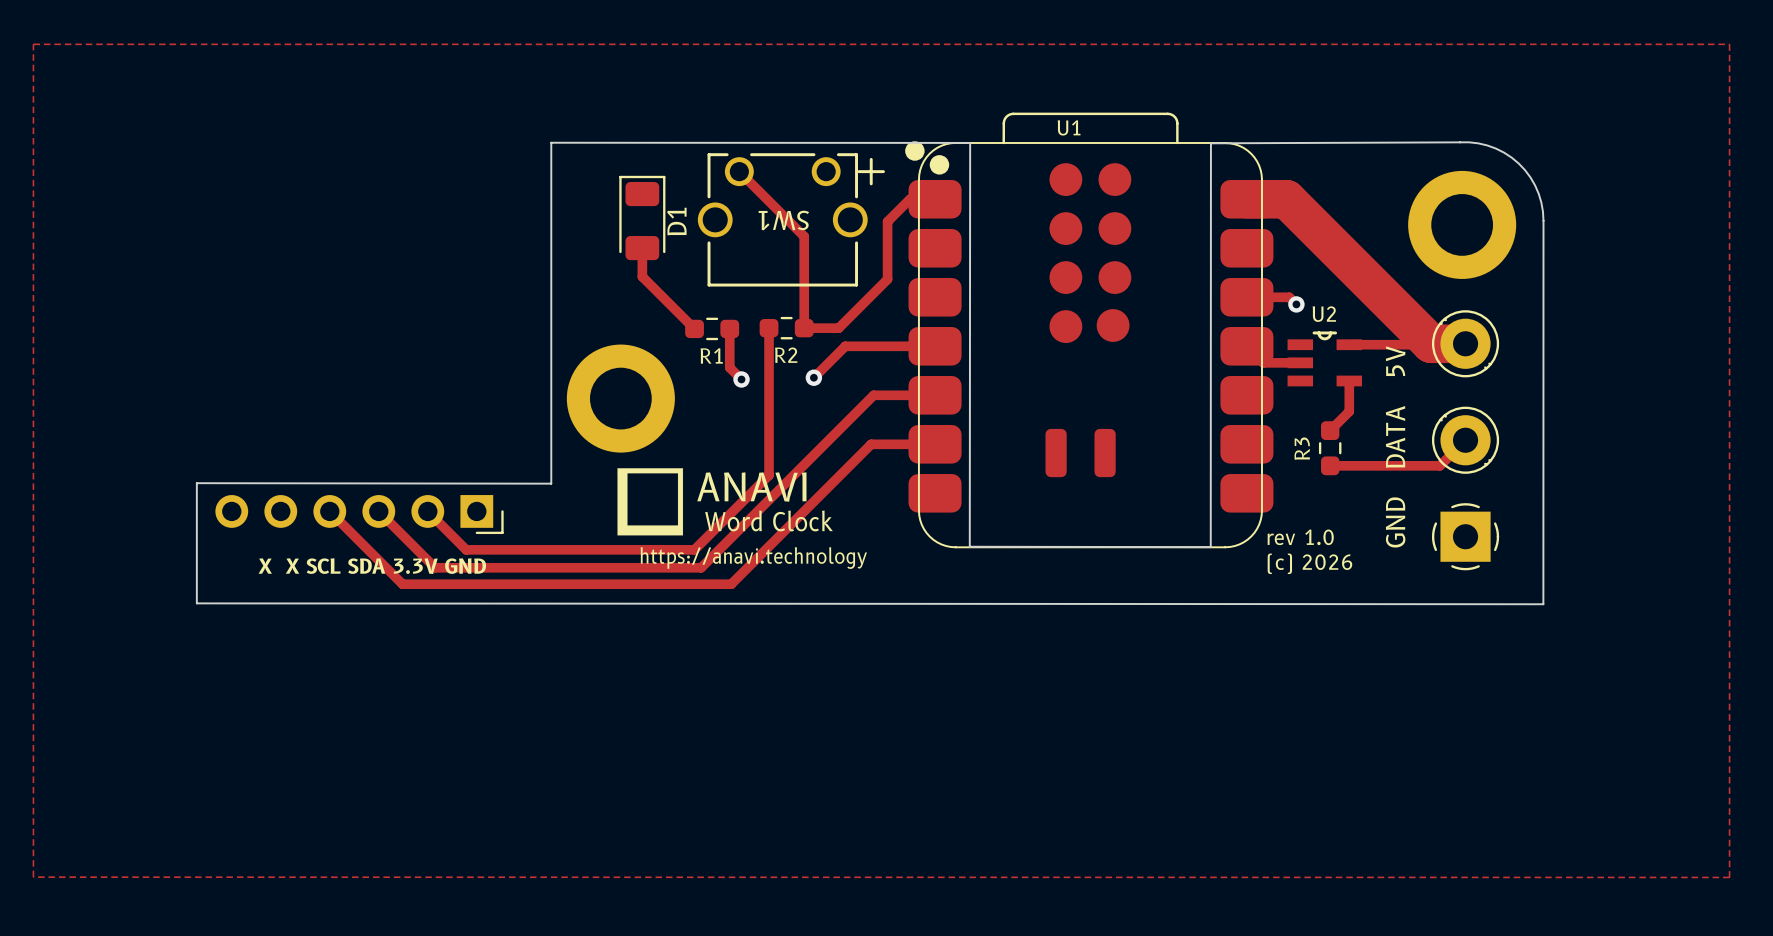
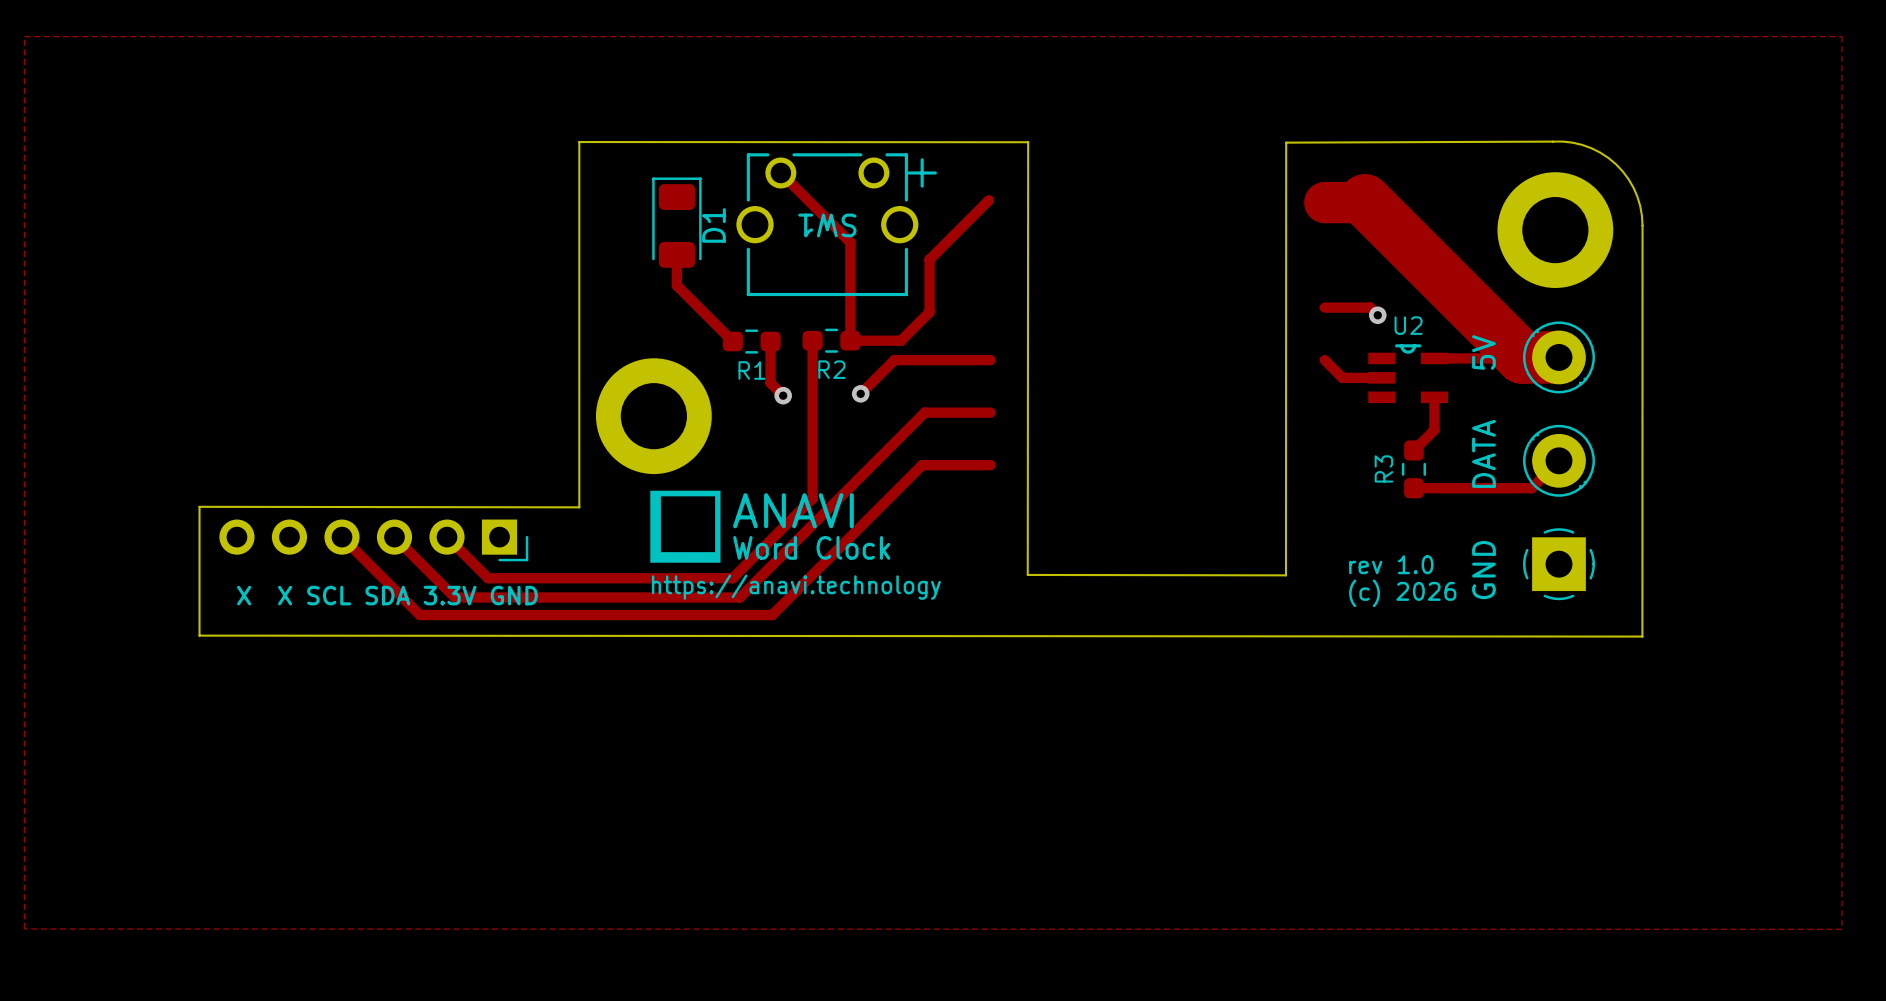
track: (935, 199) (909, 199) (887, 221) (887, 279) (838, 328) -> (988, 200) (929, 259) (929, 312) (901, 340) (887, 340)
track width: thin (1286, 199) (1431, 343) (1465, 343) -> thick (1367, 202) (1522, 357) (1558, 357)
U1: (1089, 330) -> none

